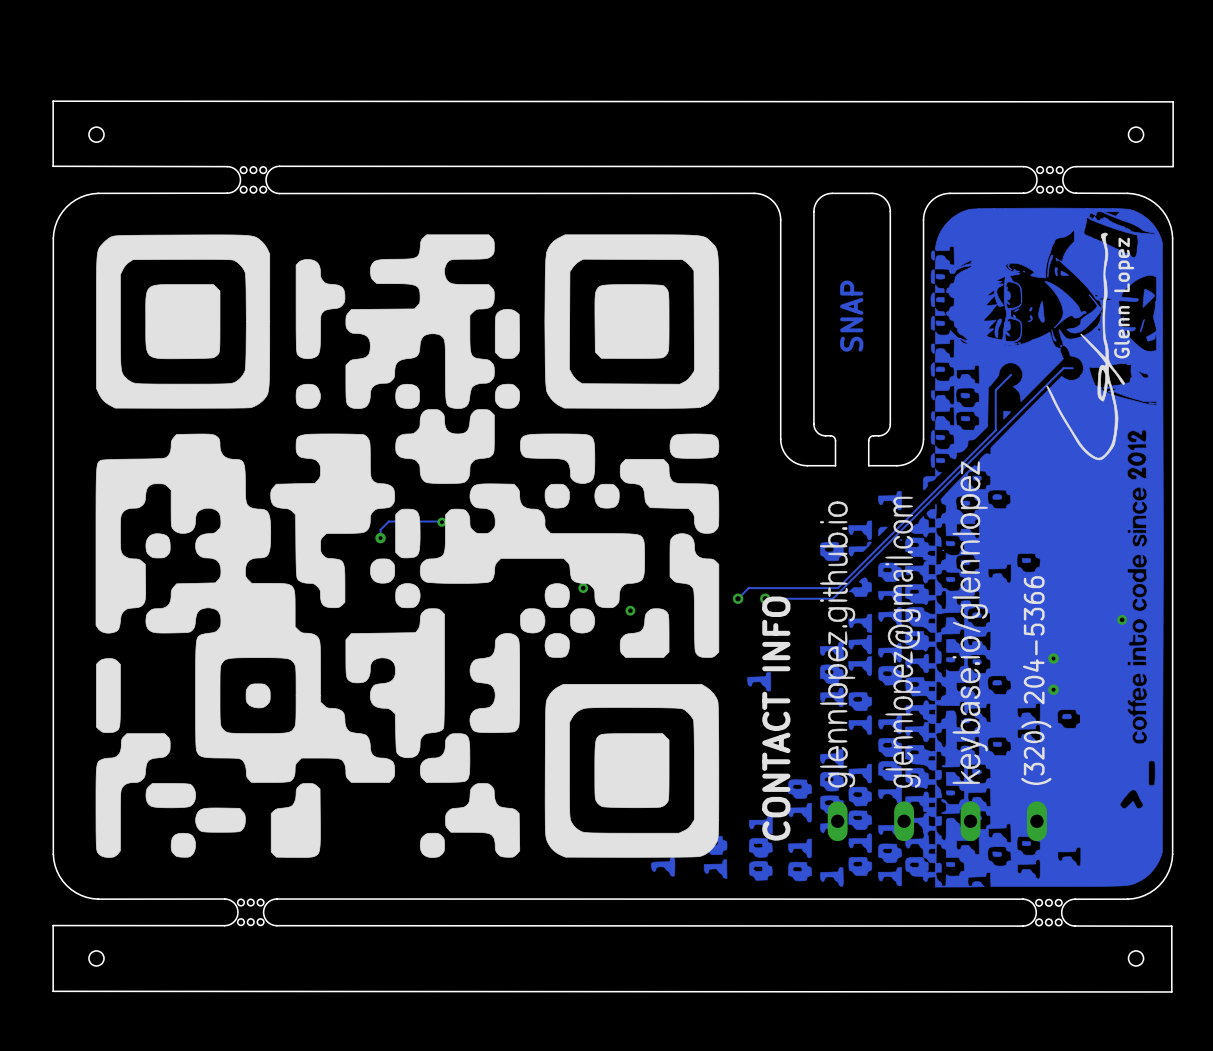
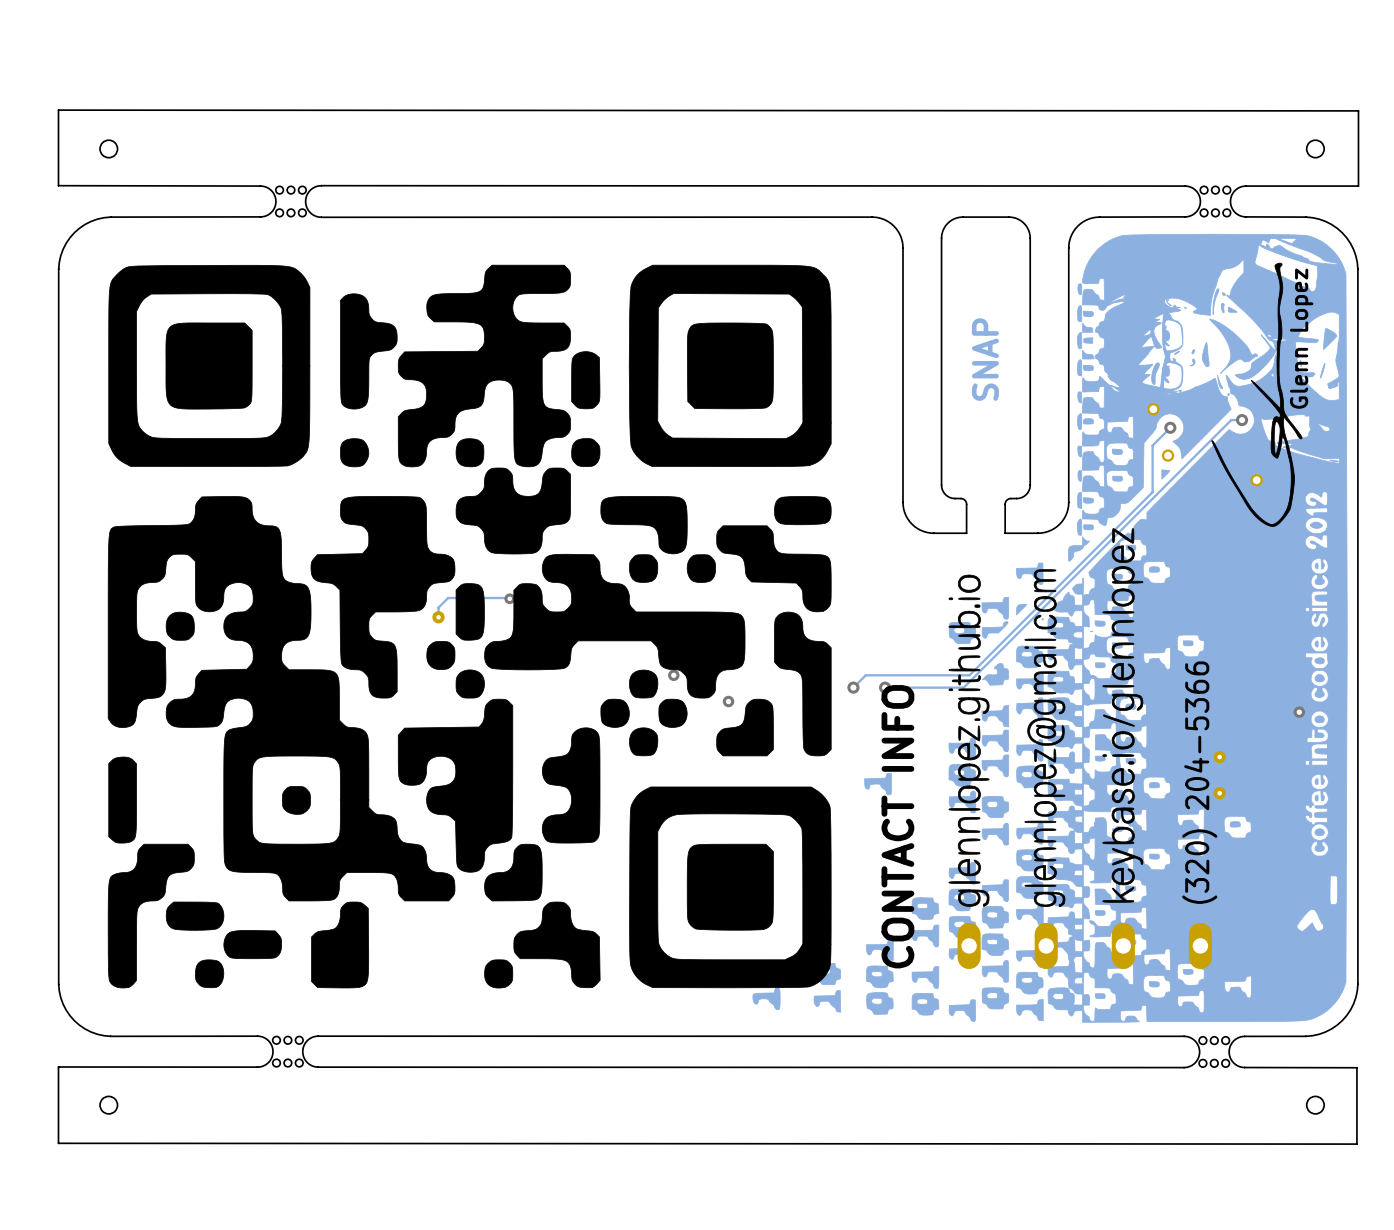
part: none -> (1153, 409)
via: none -> (1242, 420)
via: none -> (1170, 427)
part: none -> (1168, 455)
part: none -> (1256, 480)

